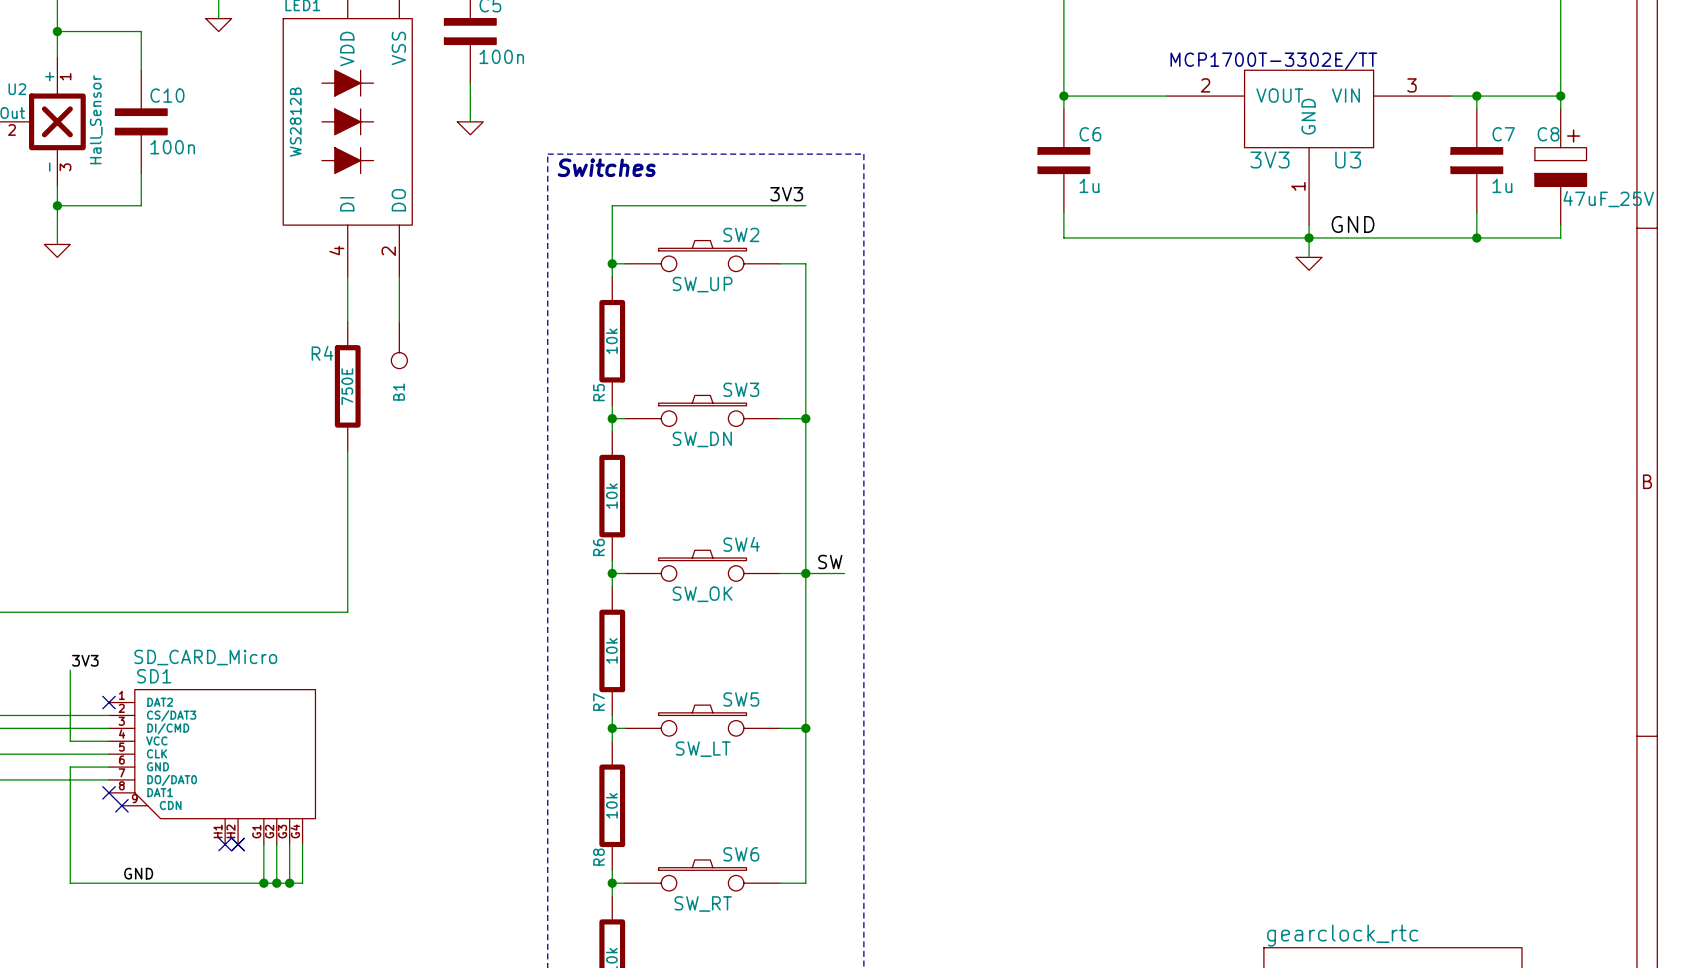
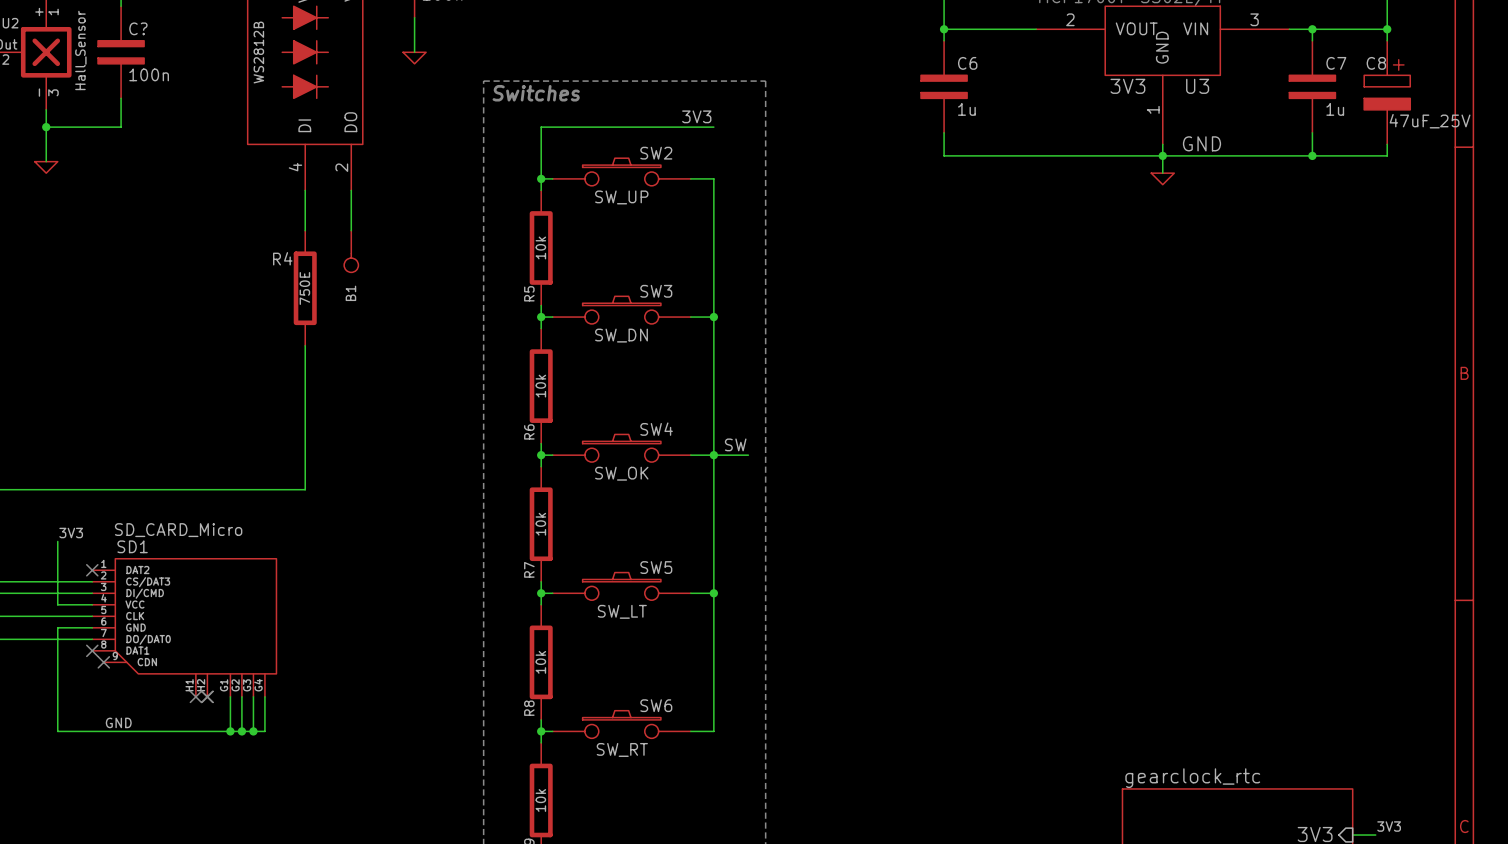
C10 name: C10 (167, 95) -> C? (138, 28)

